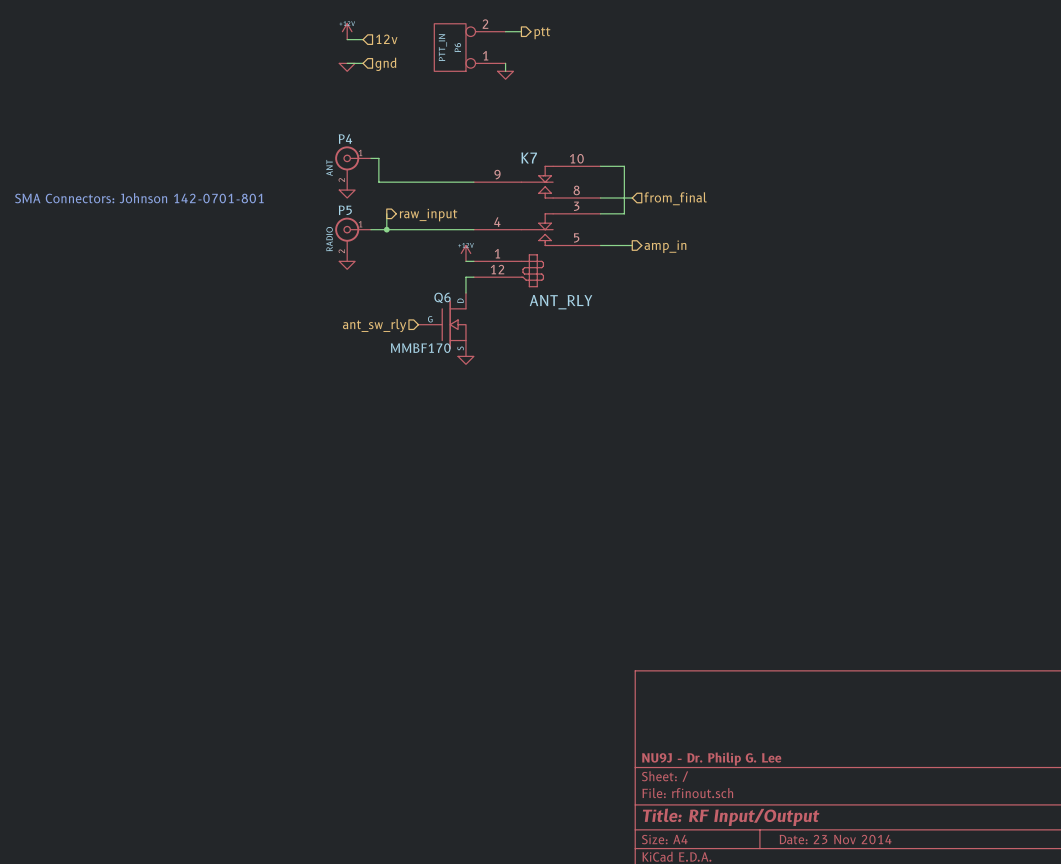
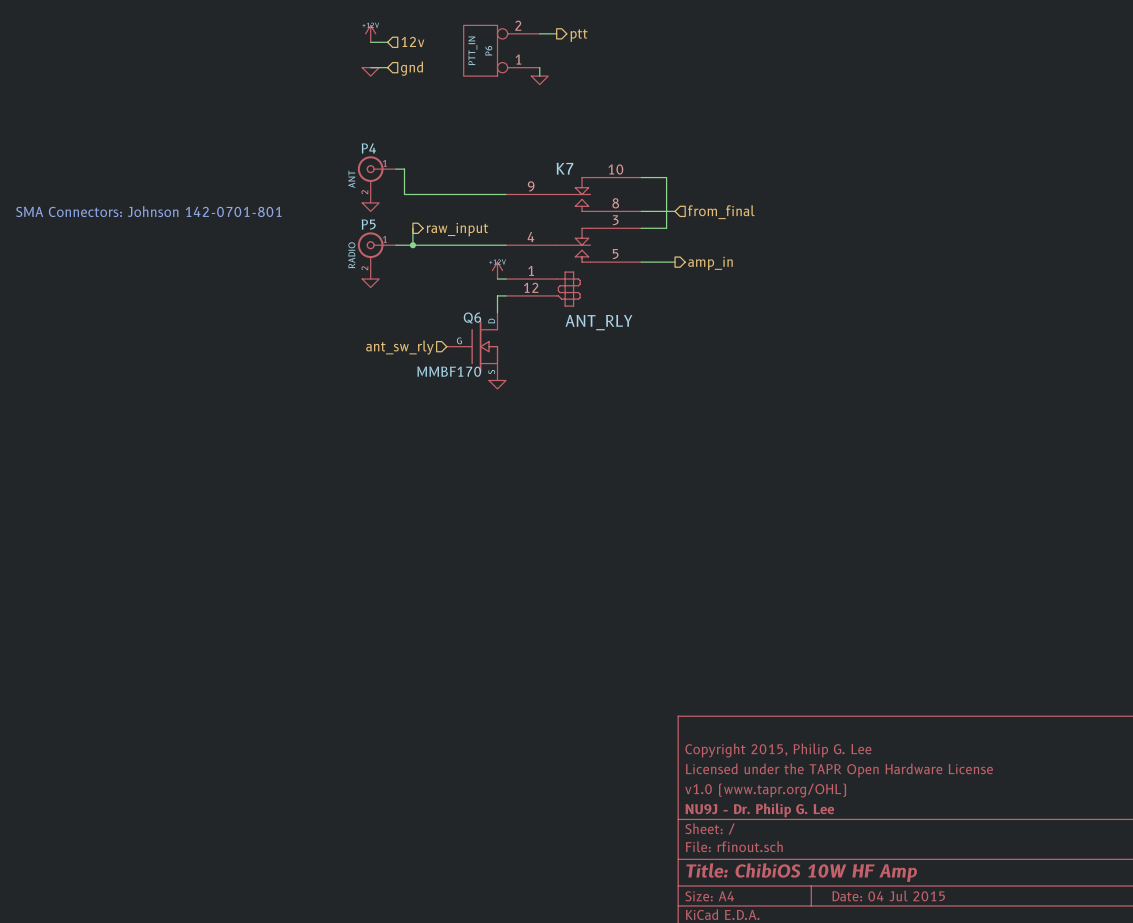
title block: none -> Copyright 2015, Philip G. Lee (778, 750)
title block: none -> Licensed under the TAPR Open Hardware License (839, 770)
title block: none -> v1.0 (www.tapr.org/OHL) (765, 790)
title block: Title: RF Input/Output (731, 817) -> Title: ChibiOS 10W HF Amp (801, 872)
title block: Date: 23 Nov 2014 (835, 839) -> Date: 04 Jul 2015 (888, 896)

